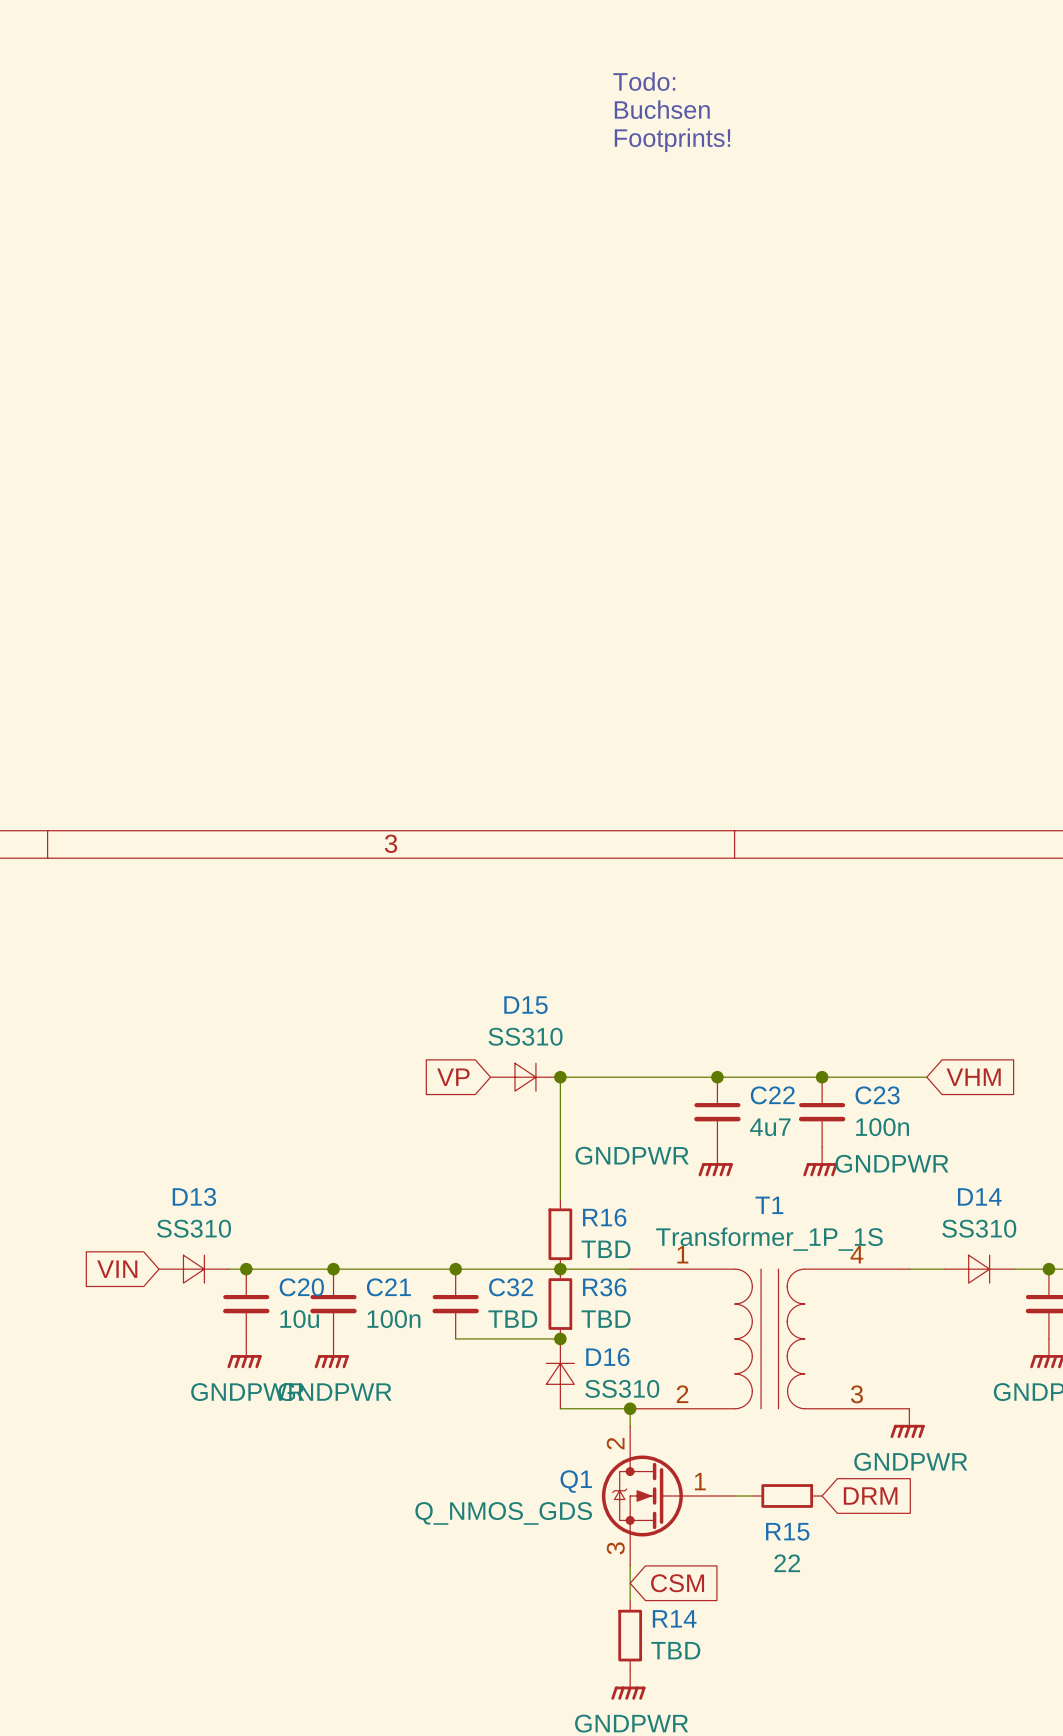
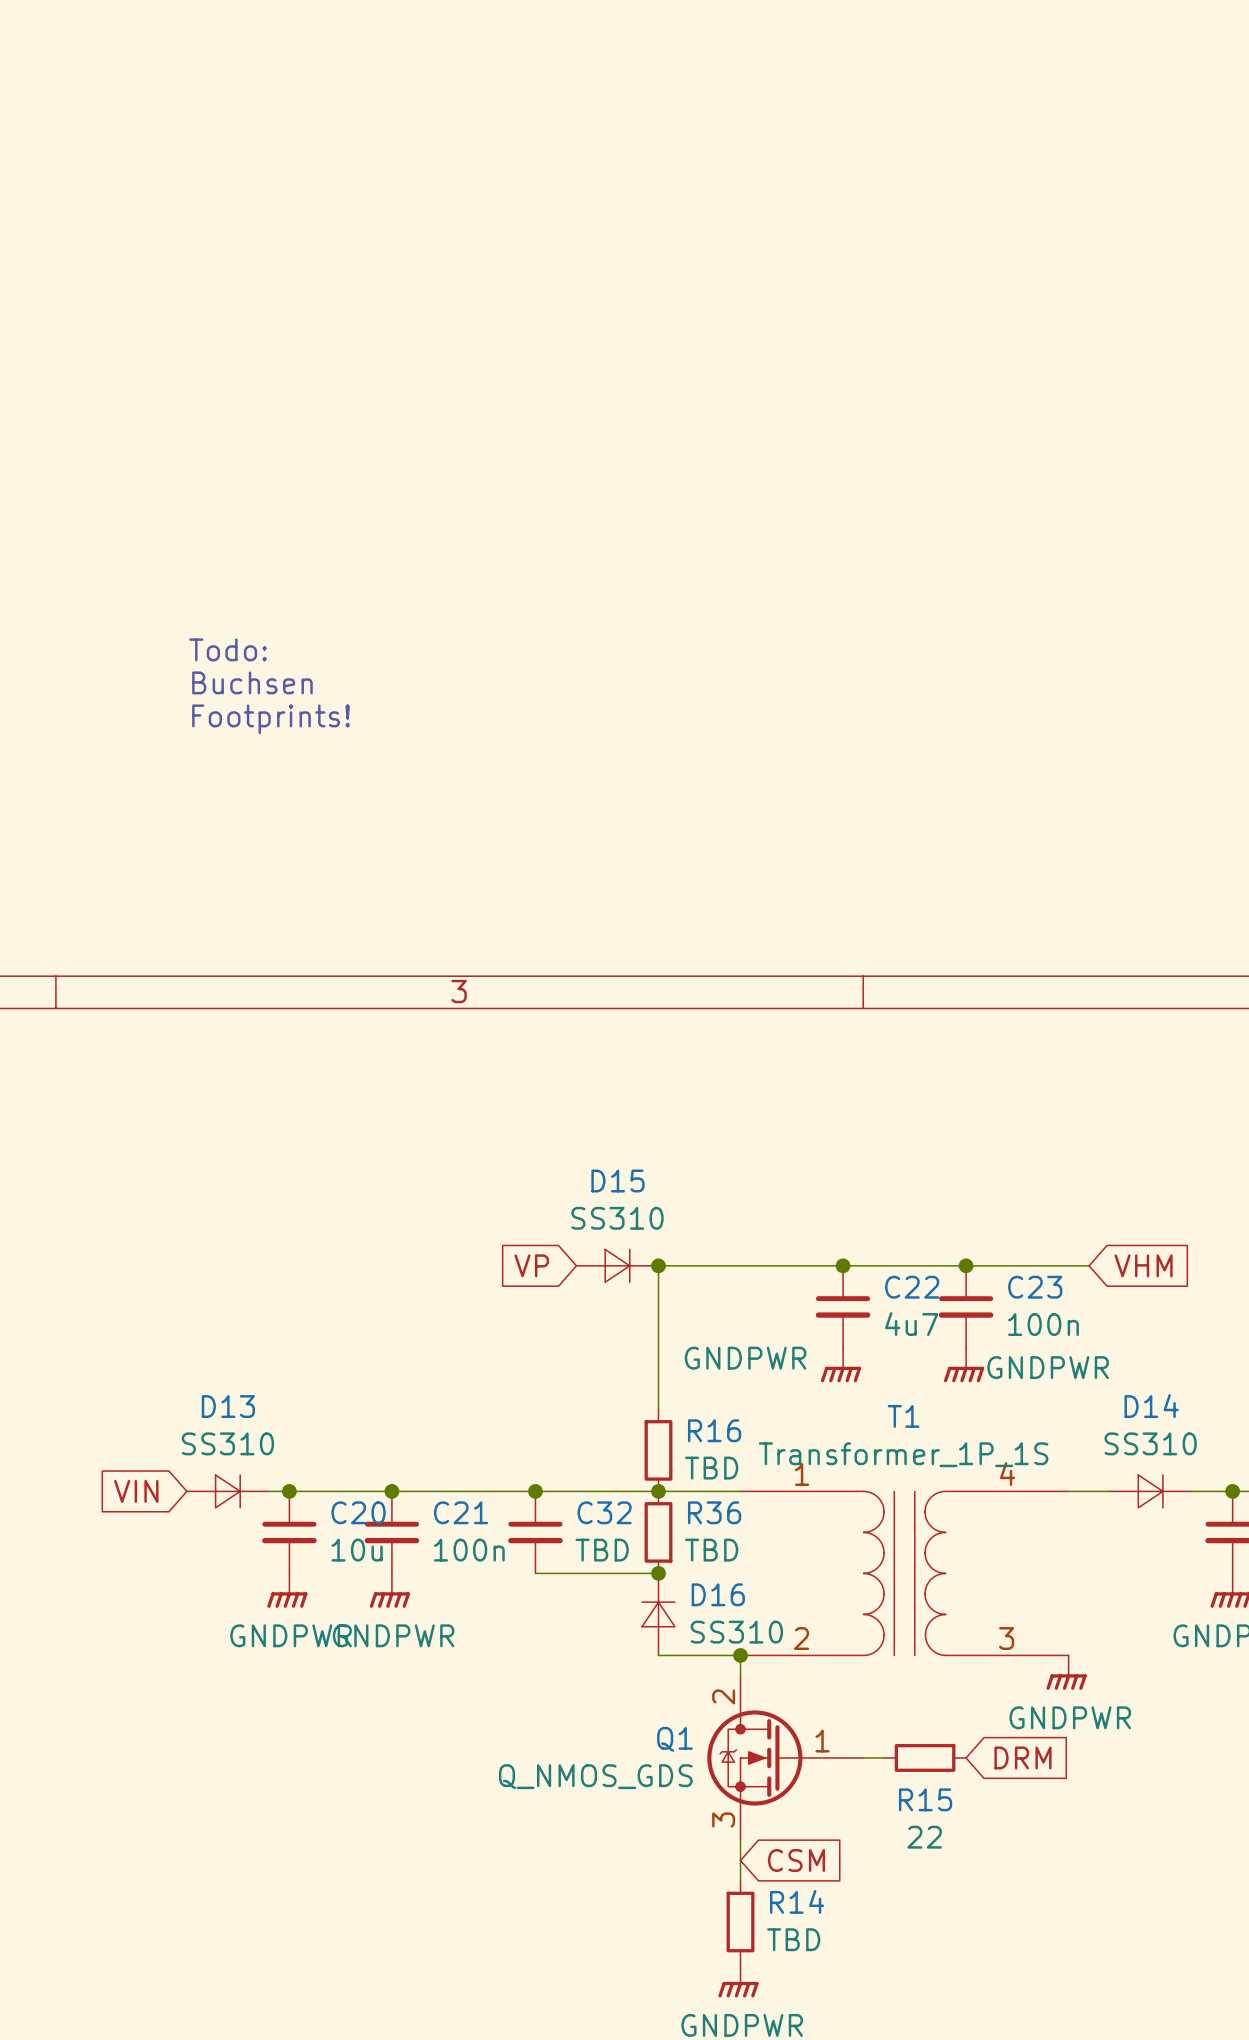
text: Todo: (644, 81) -> none
text: Buchsen (662, 109) -> none
text: Footprints! (672, 140) -> none
text: none -> Todo: (228, 649)
text: none -> Buchsen (252, 682)
text: none -> Footprints! (271, 719)

